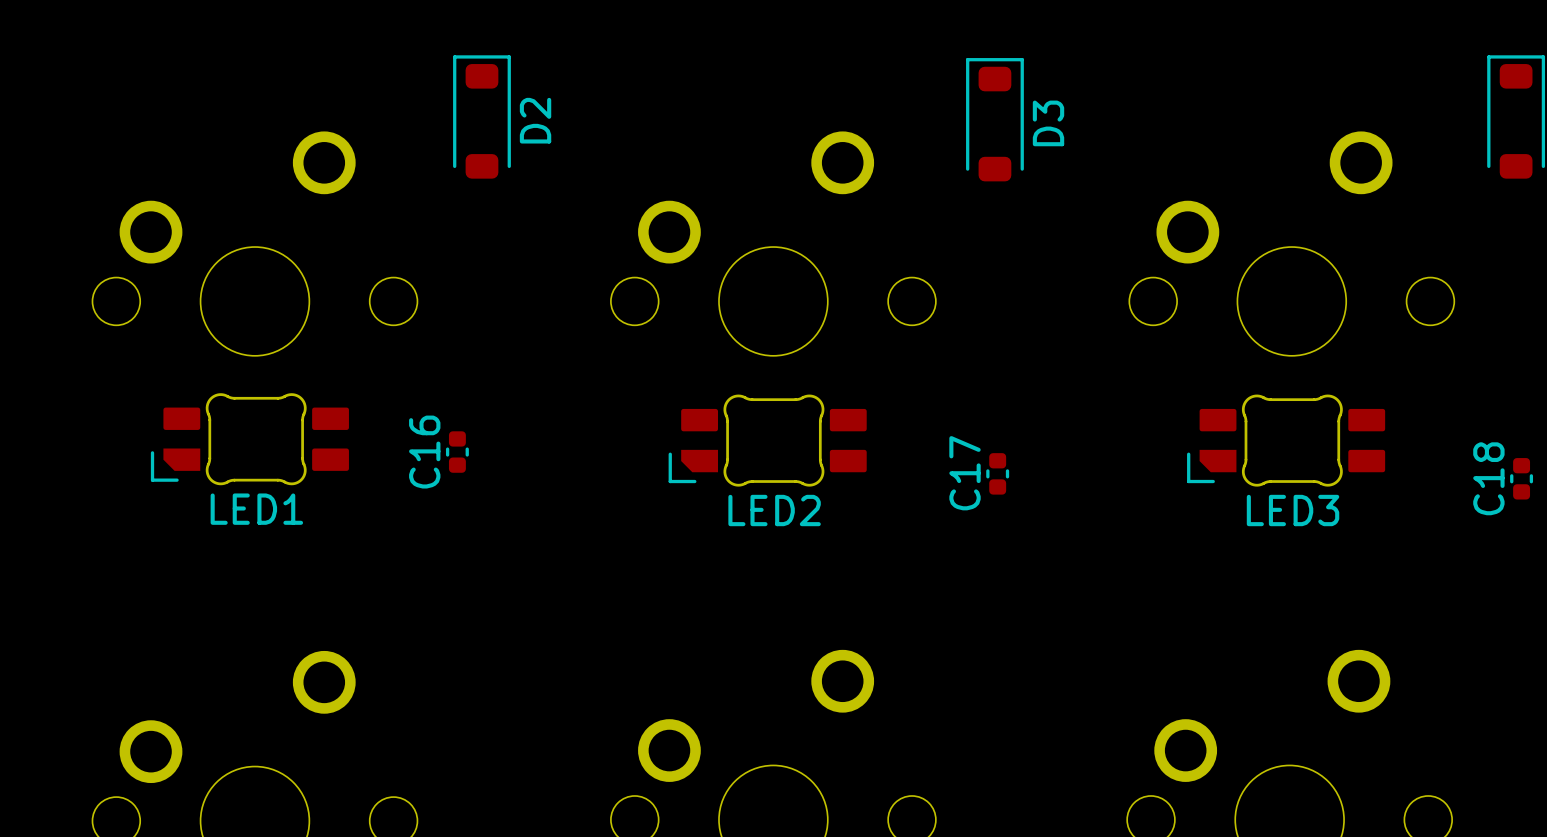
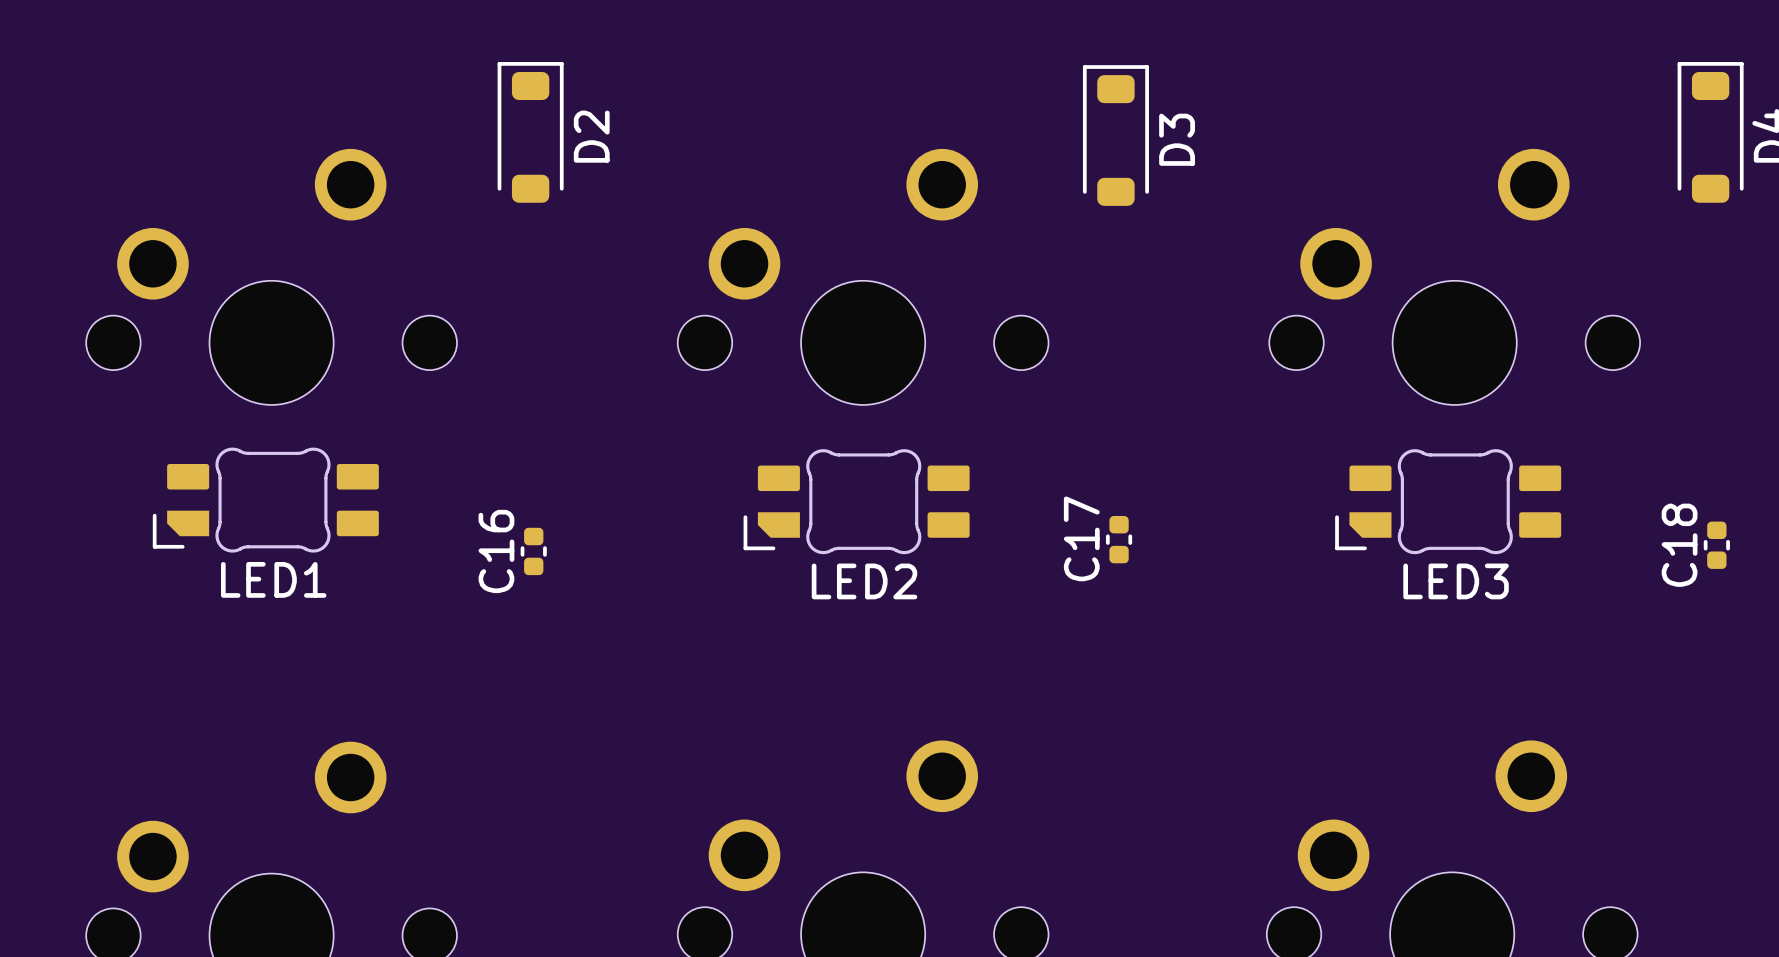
C16 position: (457, 452) -> (533, 551)

